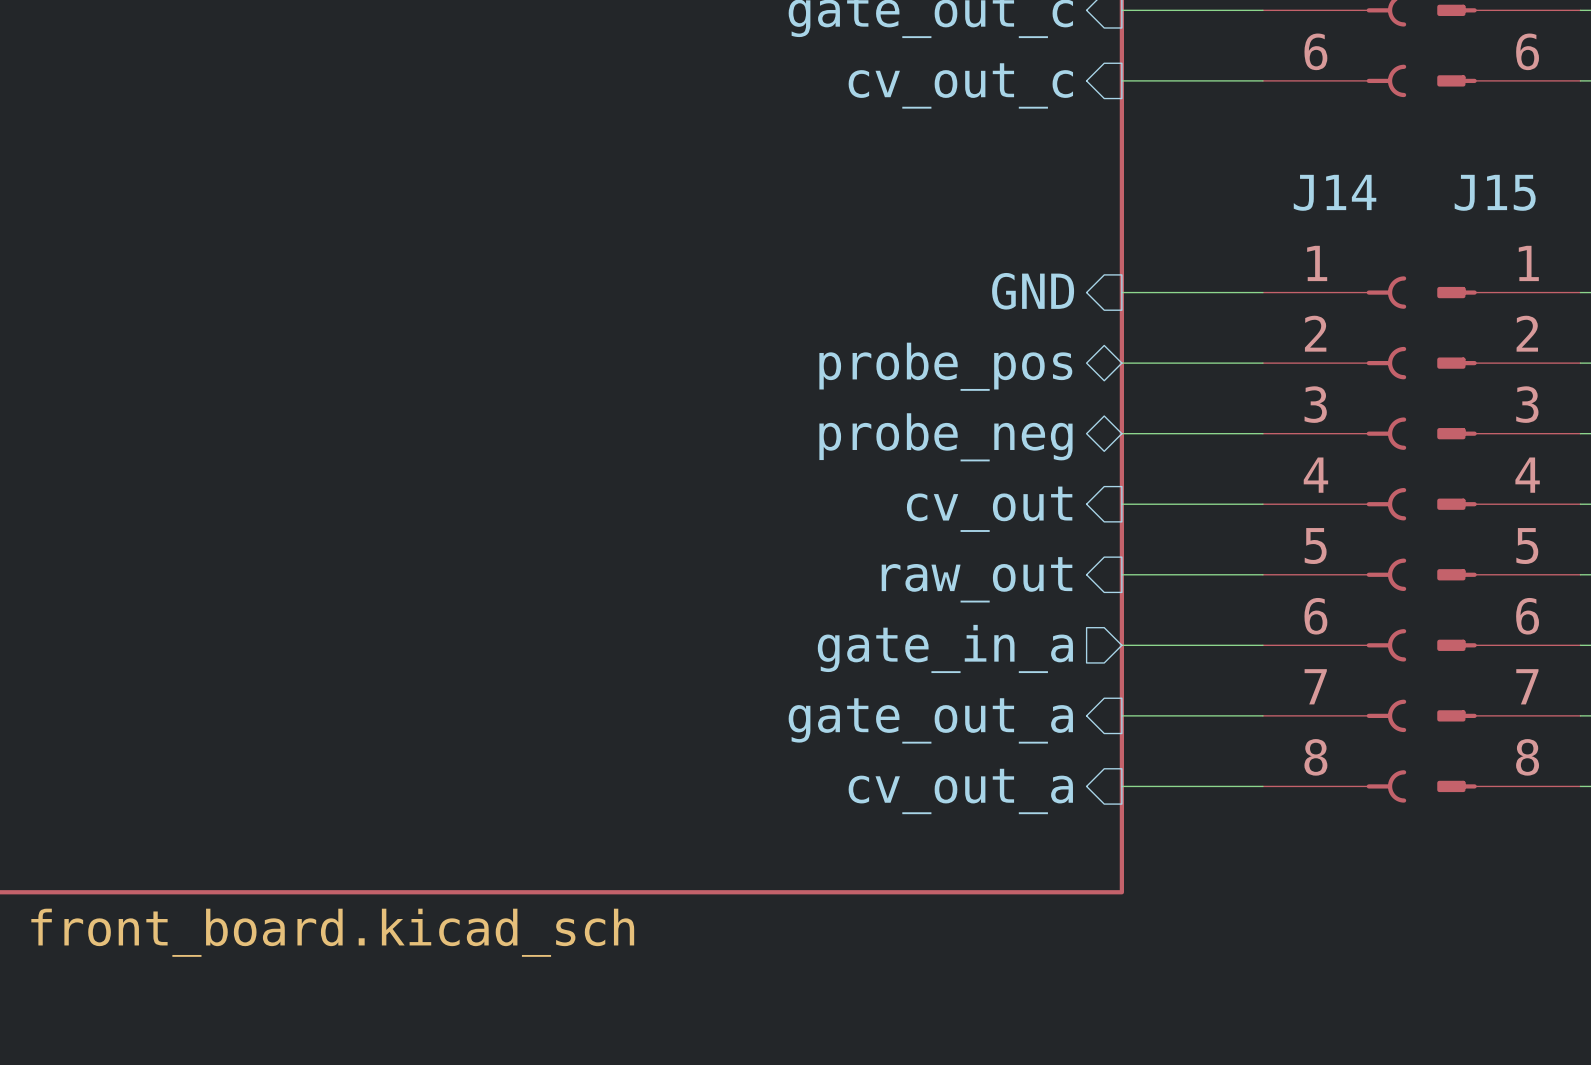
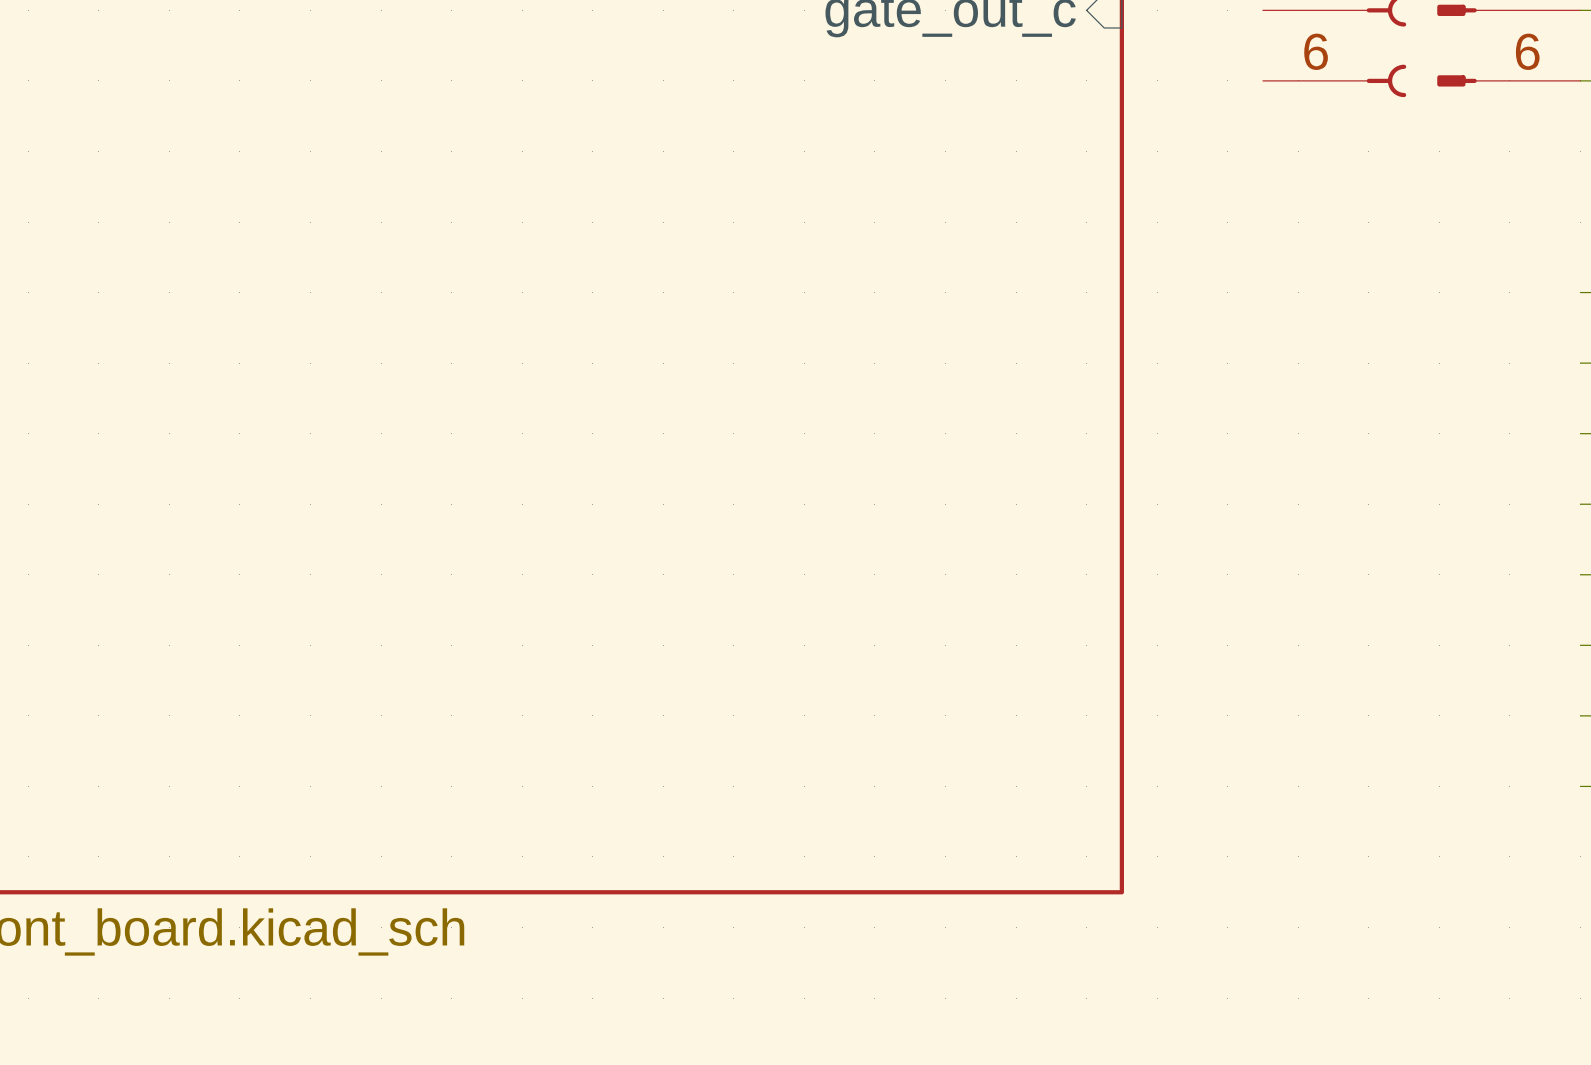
wire: (1121, 10) (1262, 10) -> none
wire: (1121, 80) (1262, 80) -> none
sheet pin: cv_out_c (960, 85) -> none
sheet pin: GND (1033, 291) -> none
wire: (1121, 292) (1262, 292) -> none
wire: (1121, 363) (1262, 363) -> none
sheet pin: probe_pos (945, 366) -> none
wire: (1121, 433) (1262, 433) -> none
sheet pin: probe_neg (945, 437) -> none
wire: (1121, 504) (1262, 504) -> none
sheet pin: cv_out (989, 509) -> none
J14: (1334, 539) -> none
J15: (1508, 539) -> none
wire: (1121, 574) (1262, 574) -> none
sheet pin: raw_out (977, 579) -> none
wire: (1121, 645) (1262, 645) -> none
sheet pin: gate_in_a (945, 648) -> none
wire: (1121, 715) (1262, 715) -> none
sheet pin: gate_out_a (930, 720) -> none
wire: (1121, 786) (1262, 786) -> none
sheet pin: cv_out_a (960, 791) -> none

